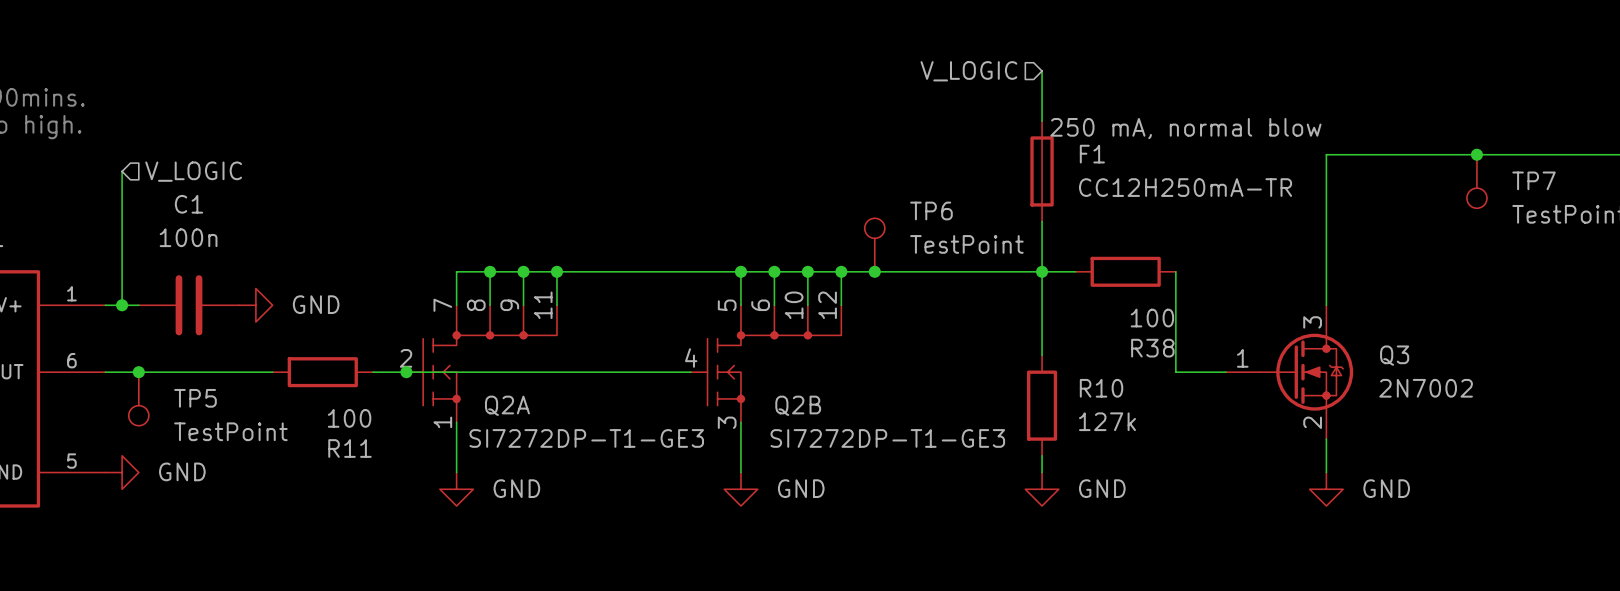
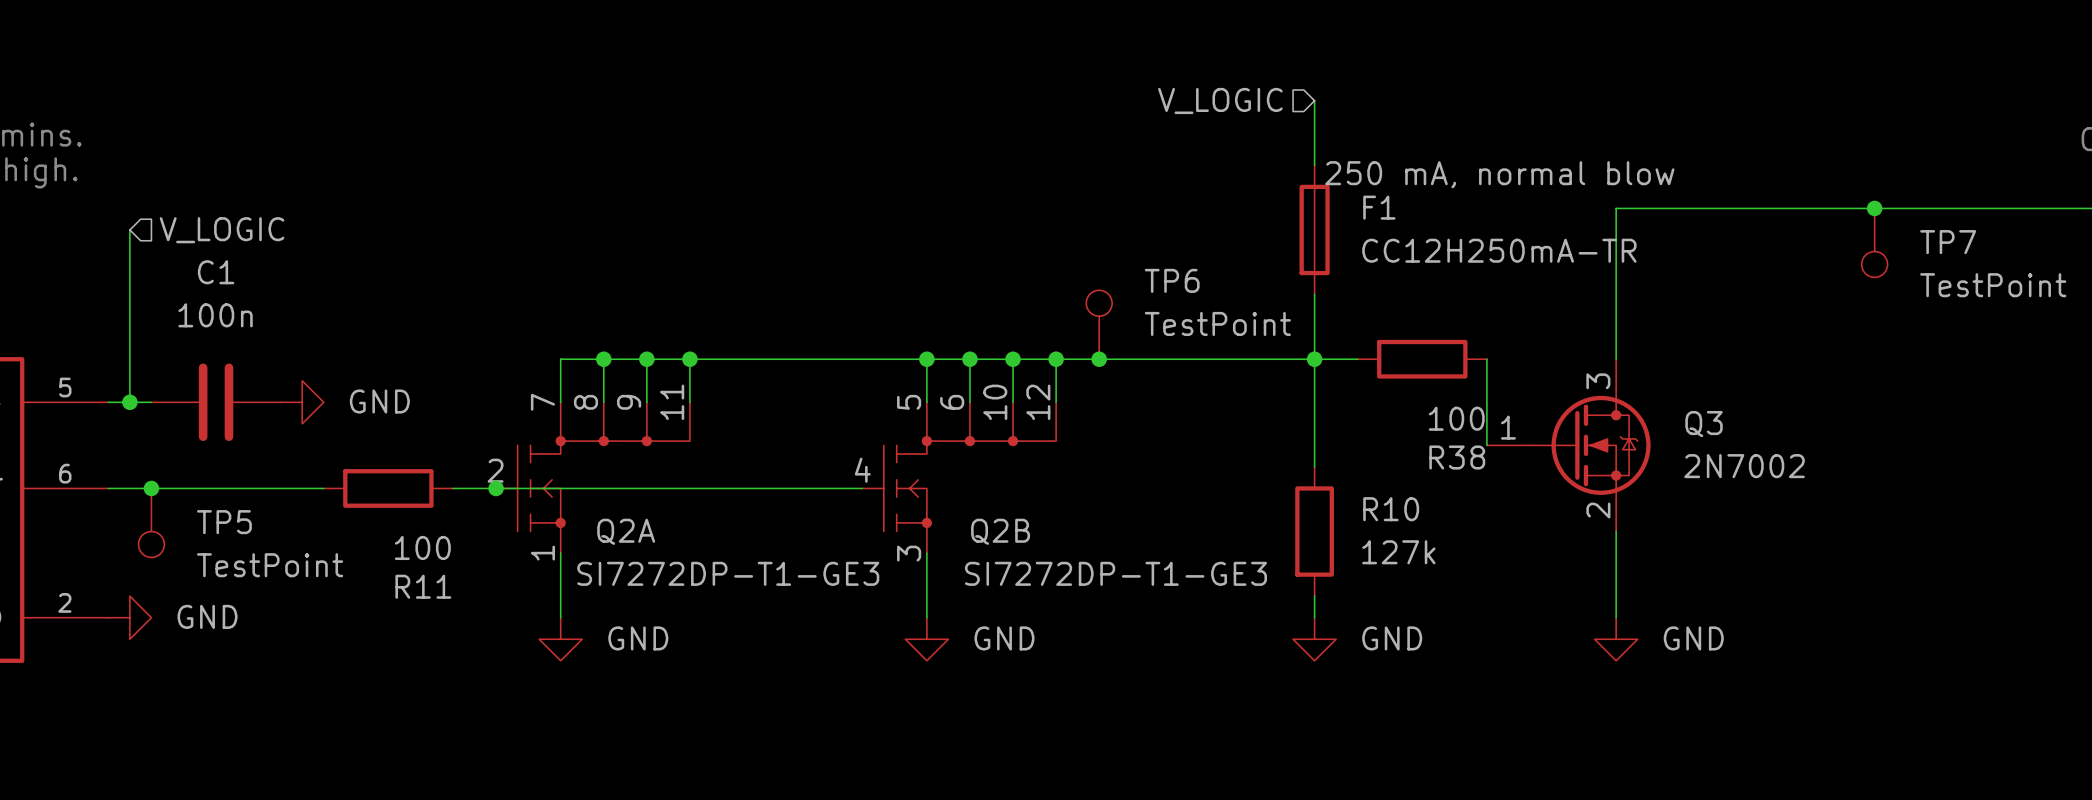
wire: (1326, 154) (1326, 305) -> (1680, 208) (1616, 208) (1616, 359)
part pin number: 1 (71, 293) -> 5 (65, 387)
wire: (1175, 338) (1175, 372) (1226, 372) -> none
Q3 position: (1289, 372) -> (1568, 445)
wire: none -> (1616, 531) (1616, 617)
wire: (1326, 439) (1326, 472) -> none
part pin number: 5 (71, 461) -> 2 (64, 602)
power symbol position: GND (1326, 489) -> GND (1616, 639)

